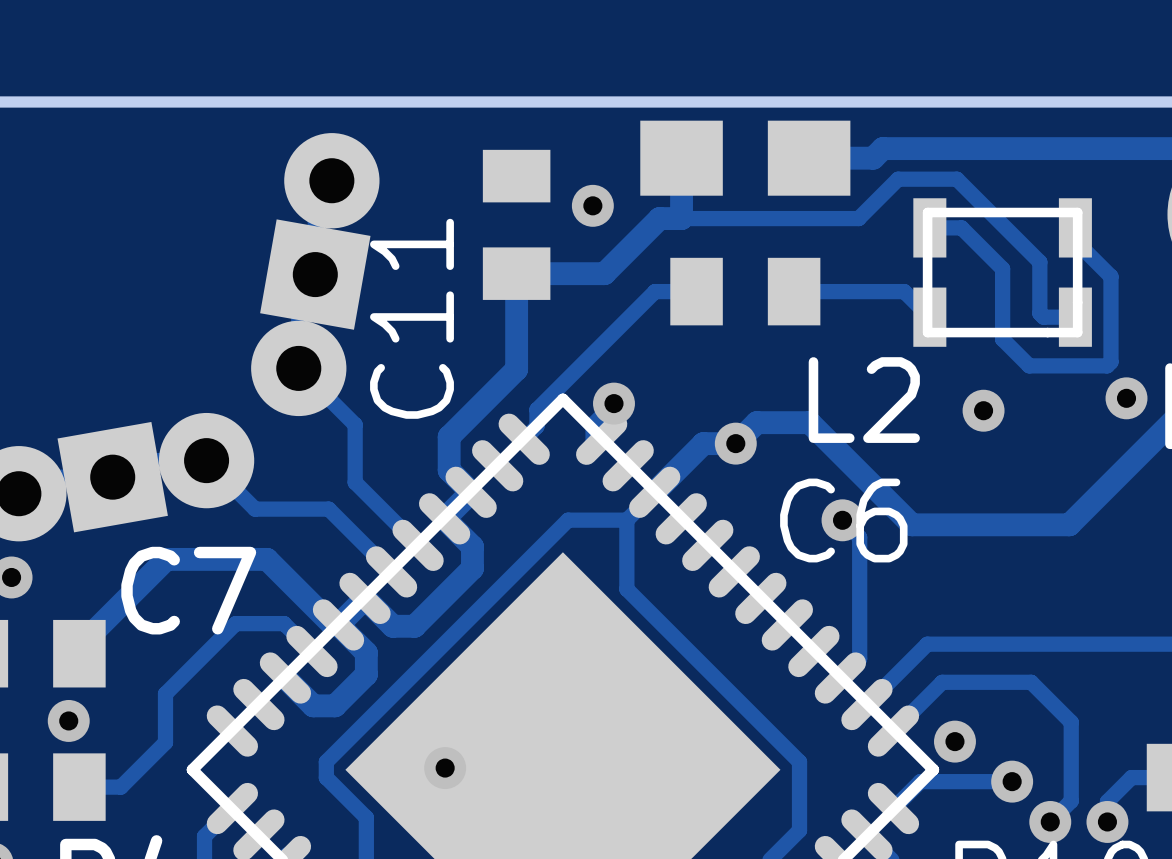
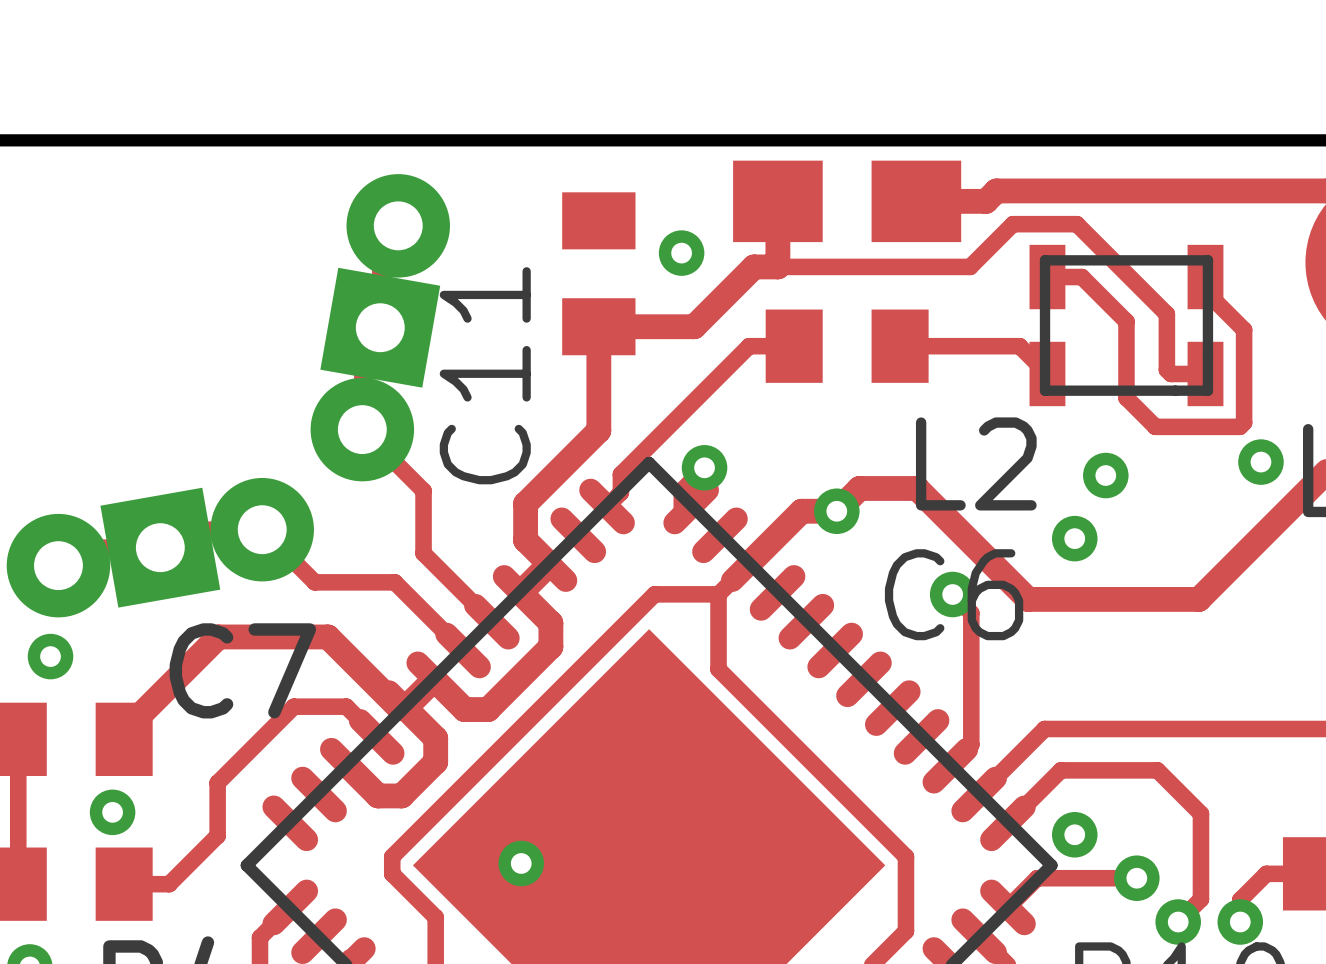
via: none -> (1074, 538)

